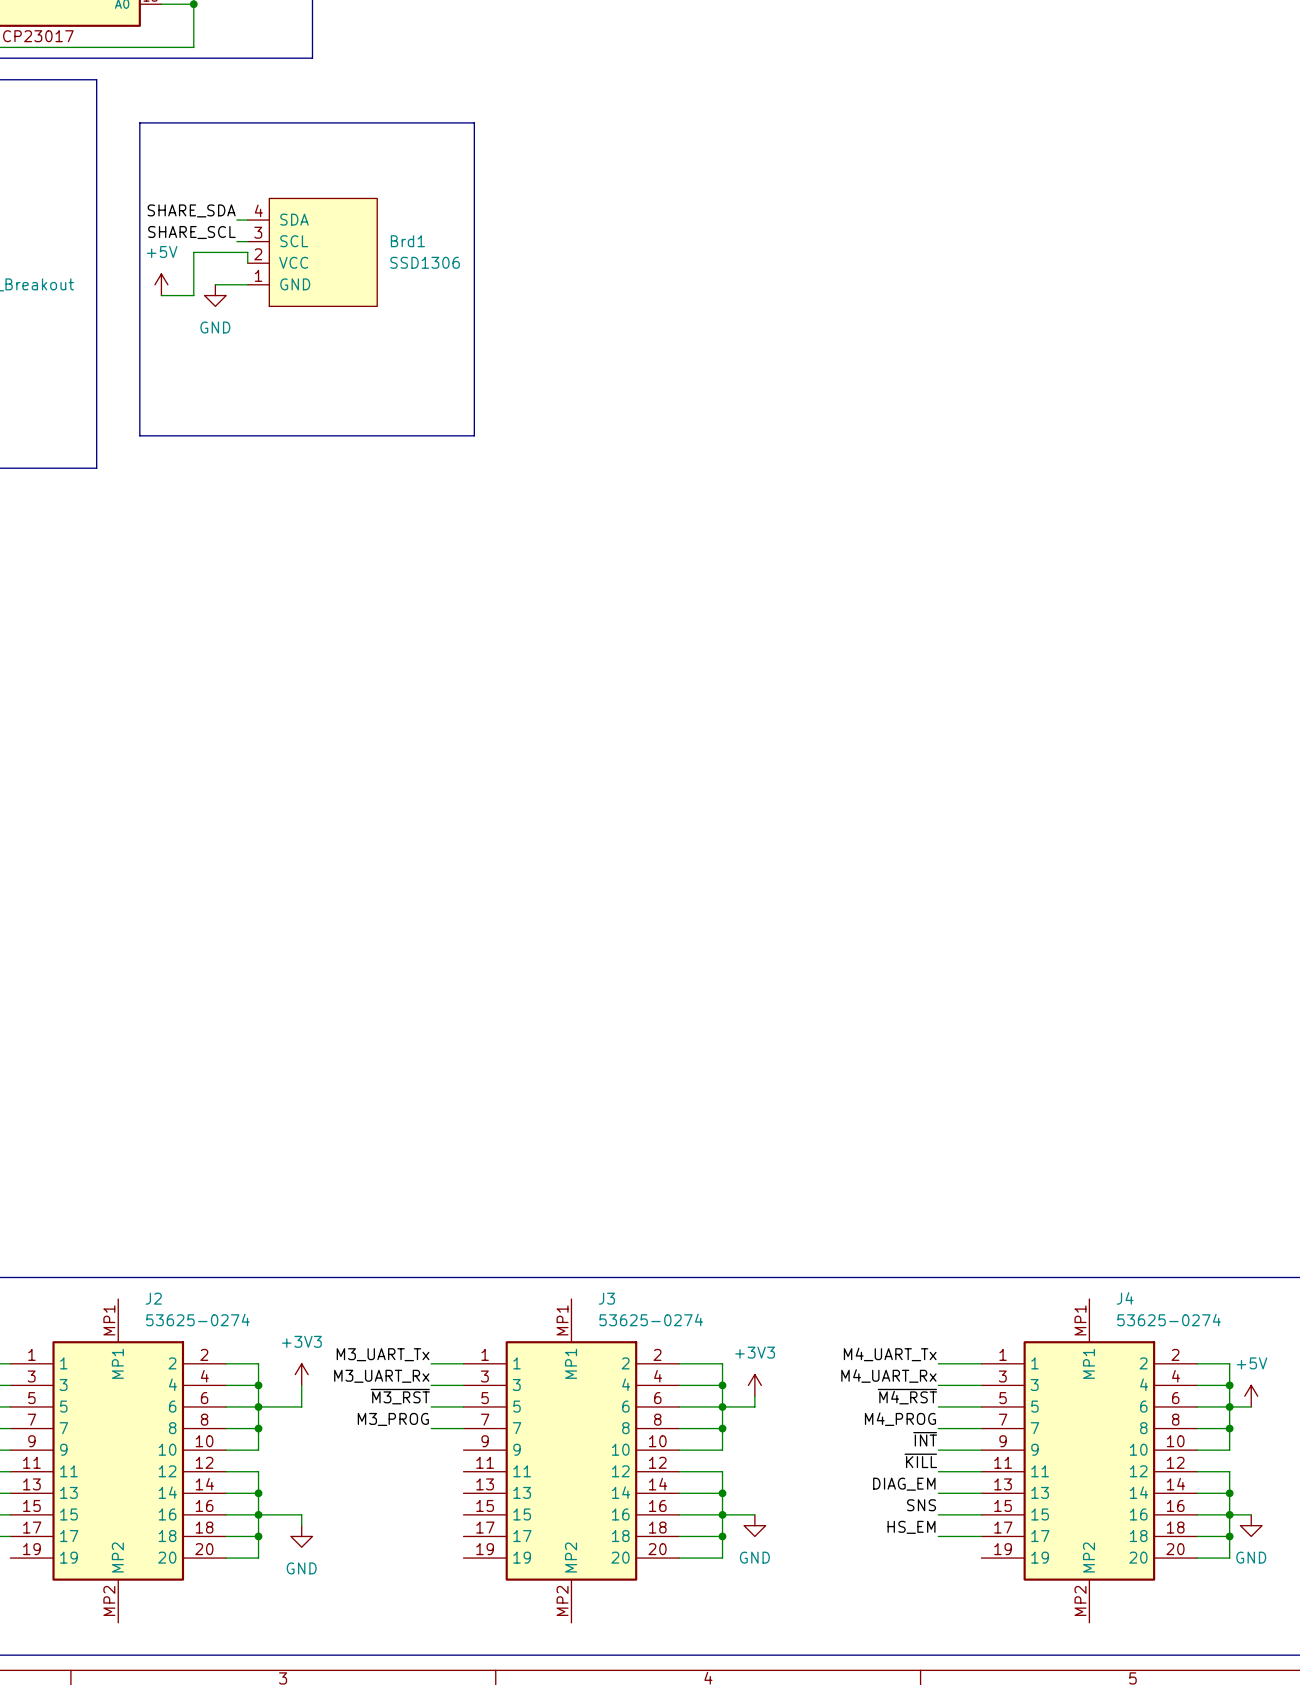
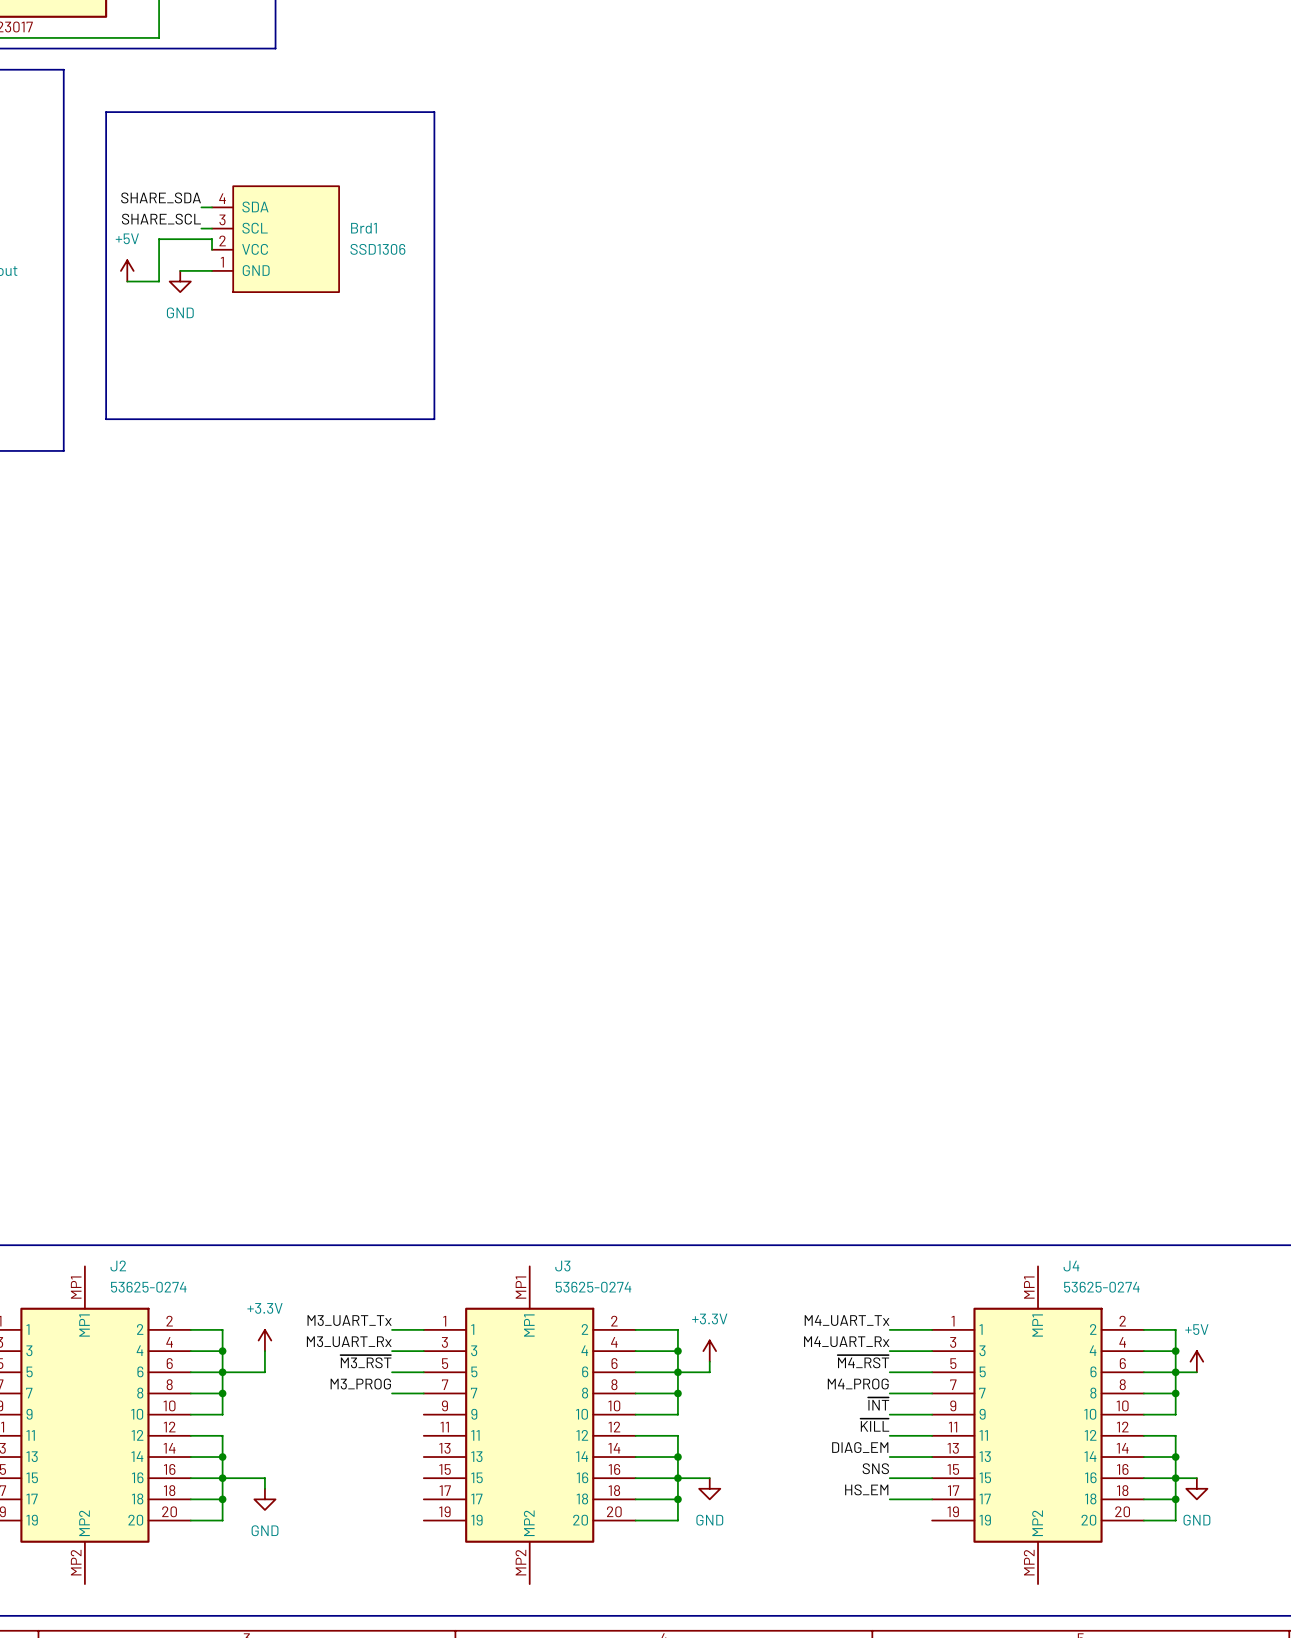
power symbol: +3V3 (301, 1374) -> +3.3V (264, 1340)
power symbol: +3V3 (754, 1385) -> +3.3V (709, 1351)

